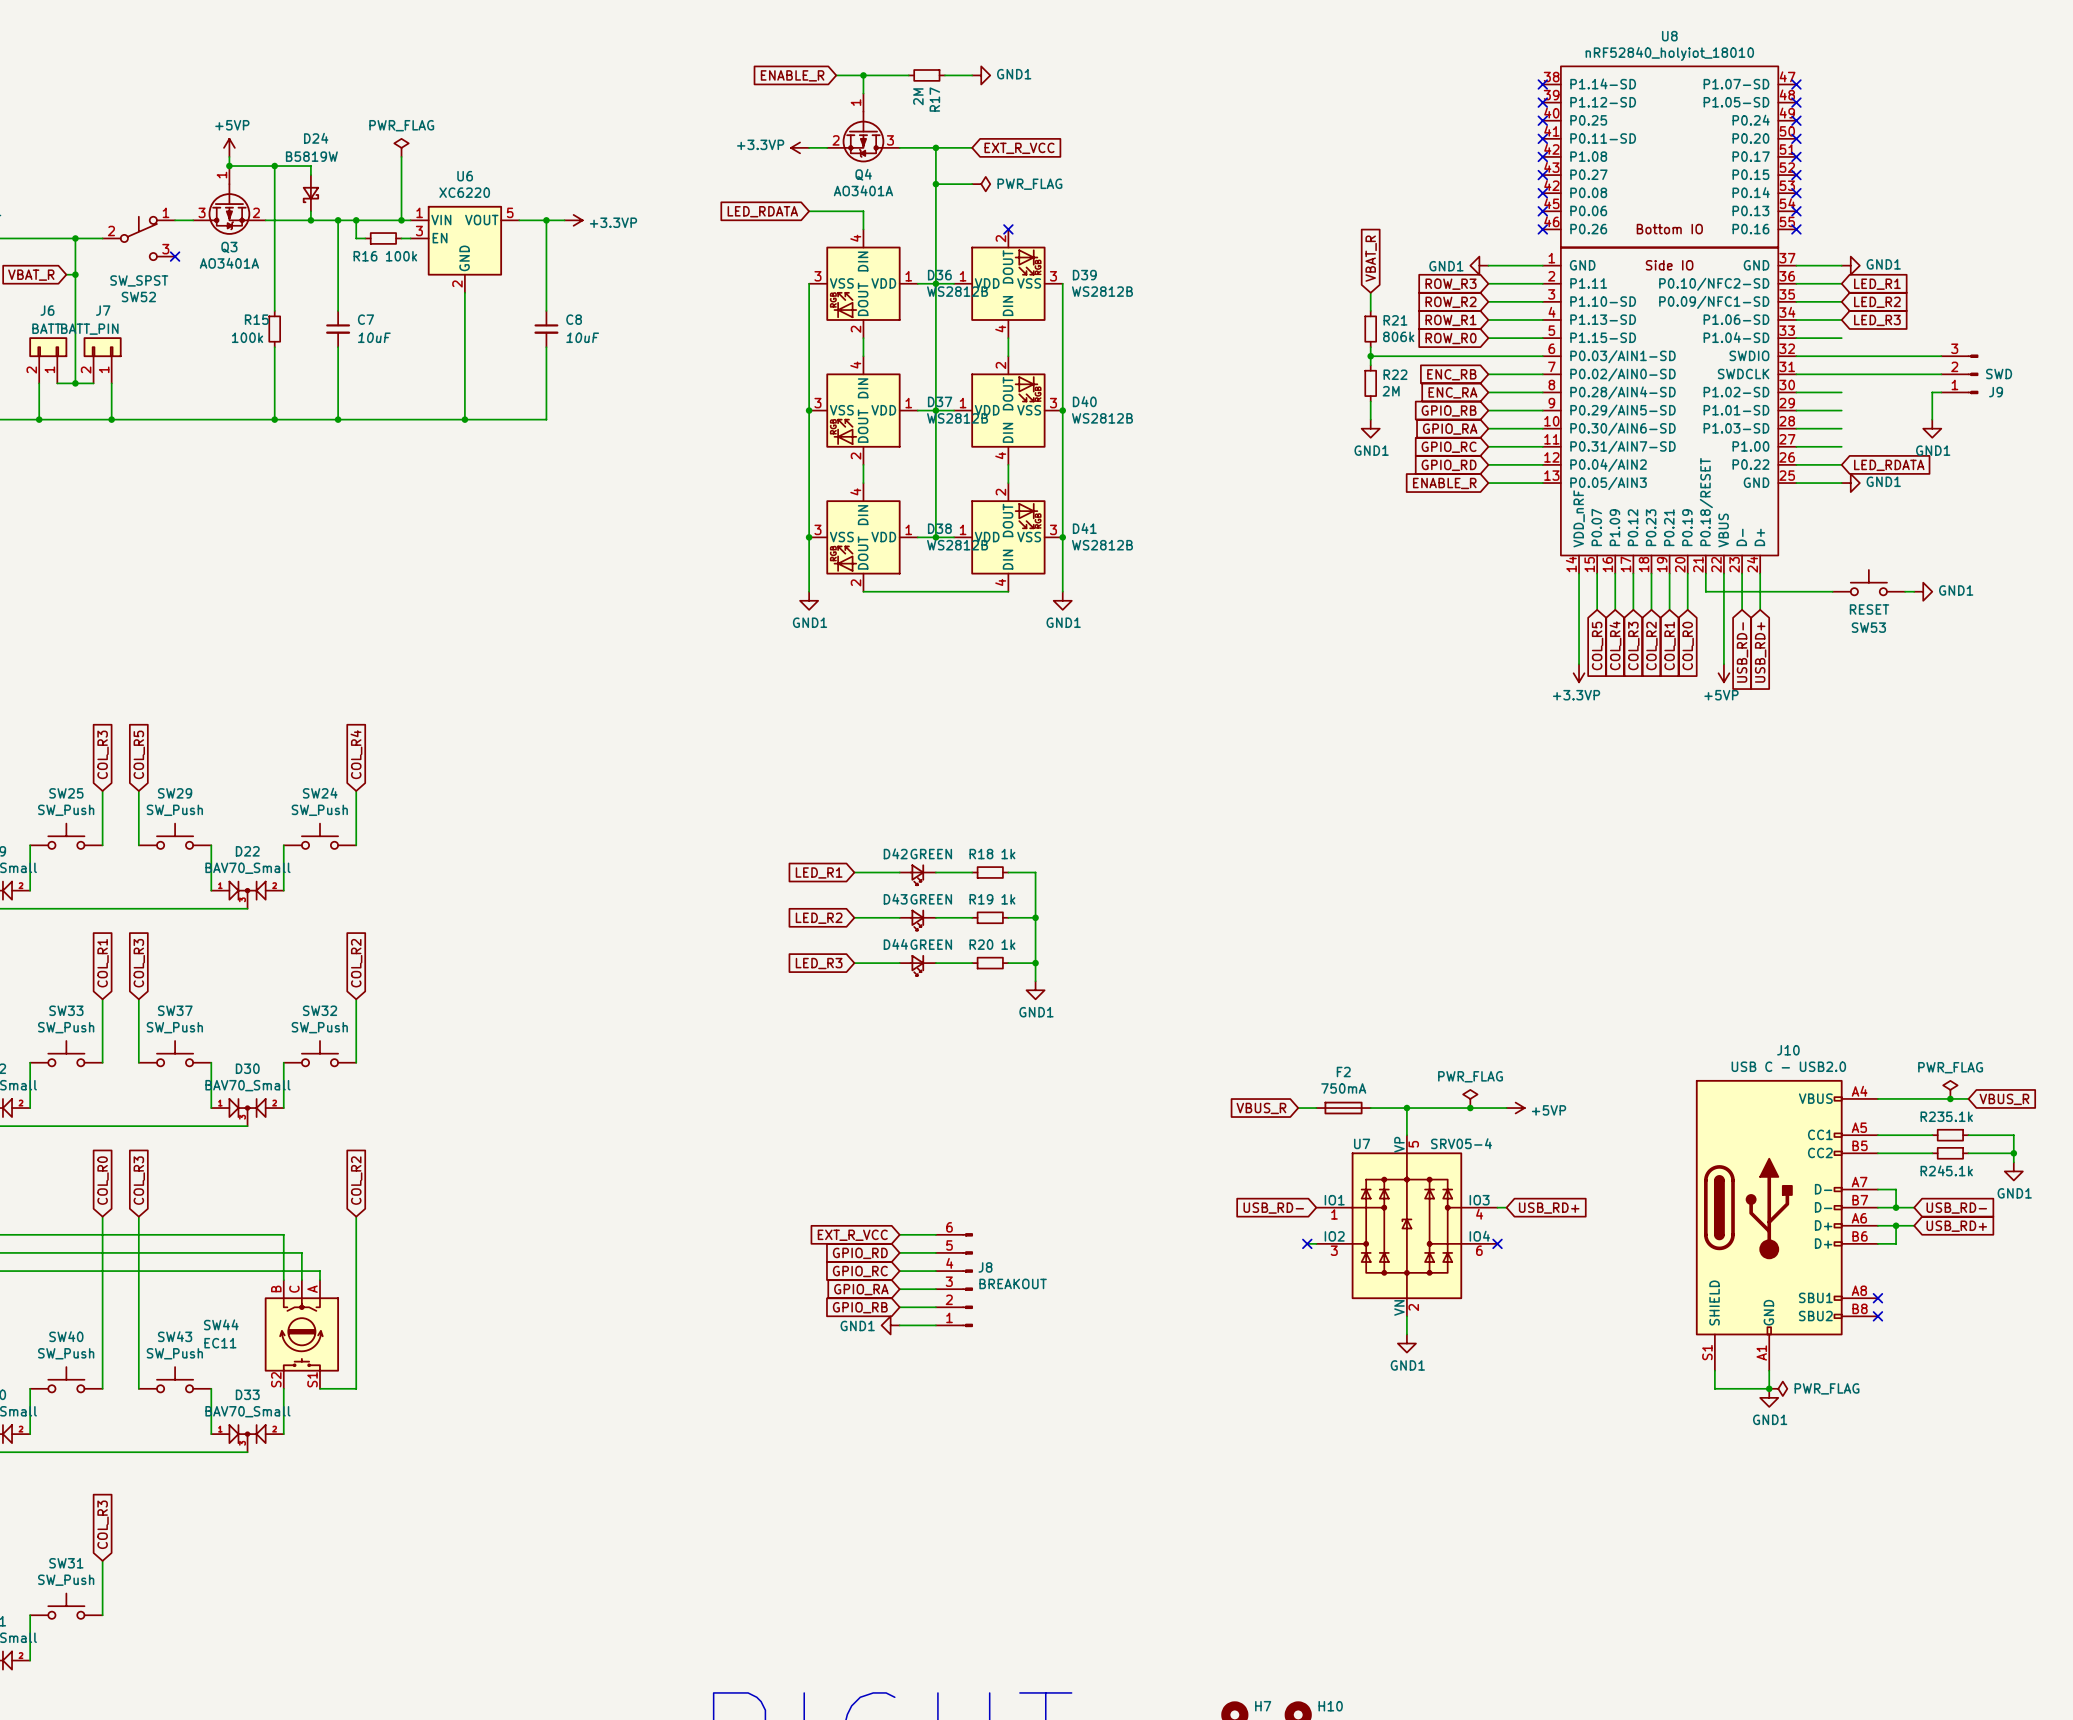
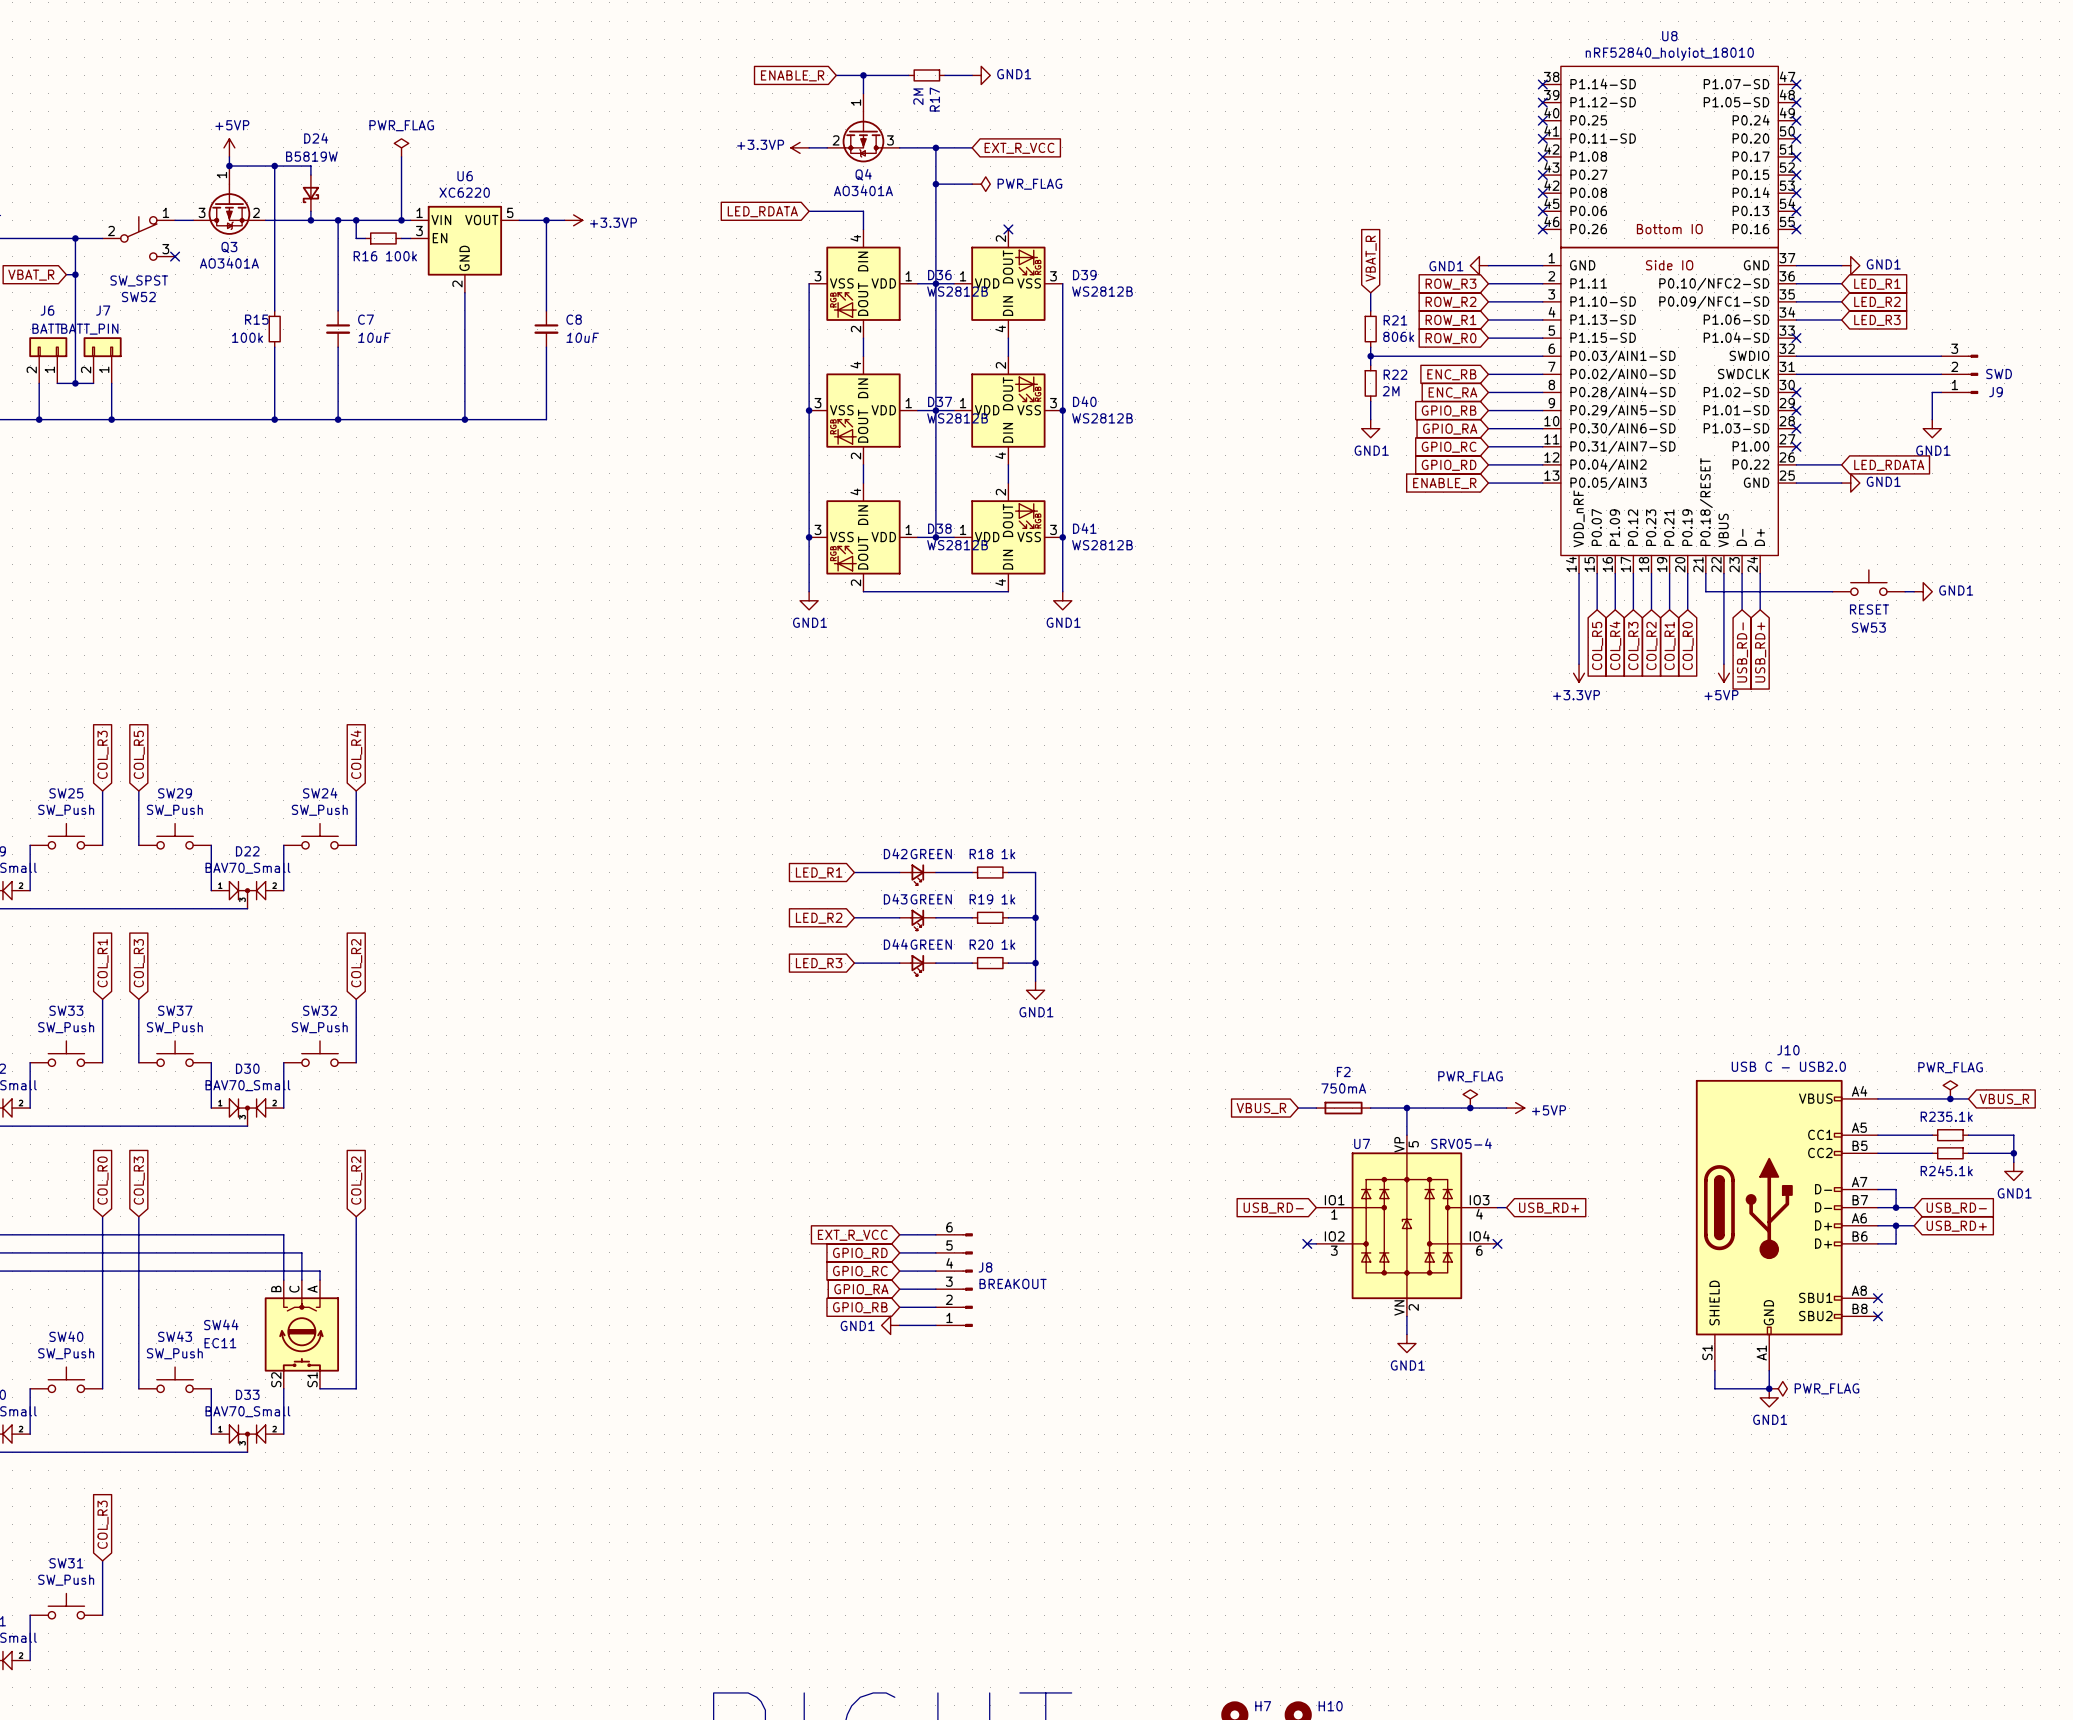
wire: (1796, 338) (1841, 338) -> none
no-connect mark: none -> (1796, 338)
wire: (1796, 392) (1841, 392) -> none
no-connect mark: none -> (1796, 392)
wire: (1796, 410) (1841, 410) -> none
no-connect mark: none -> (1796, 410)
wire: (1796, 428) (1841, 428) -> none
no-connect mark: none -> (1796, 428)
wire: (1796, 446) (1841, 446) -> none
no-connect mark: none -> (1796, 446)

